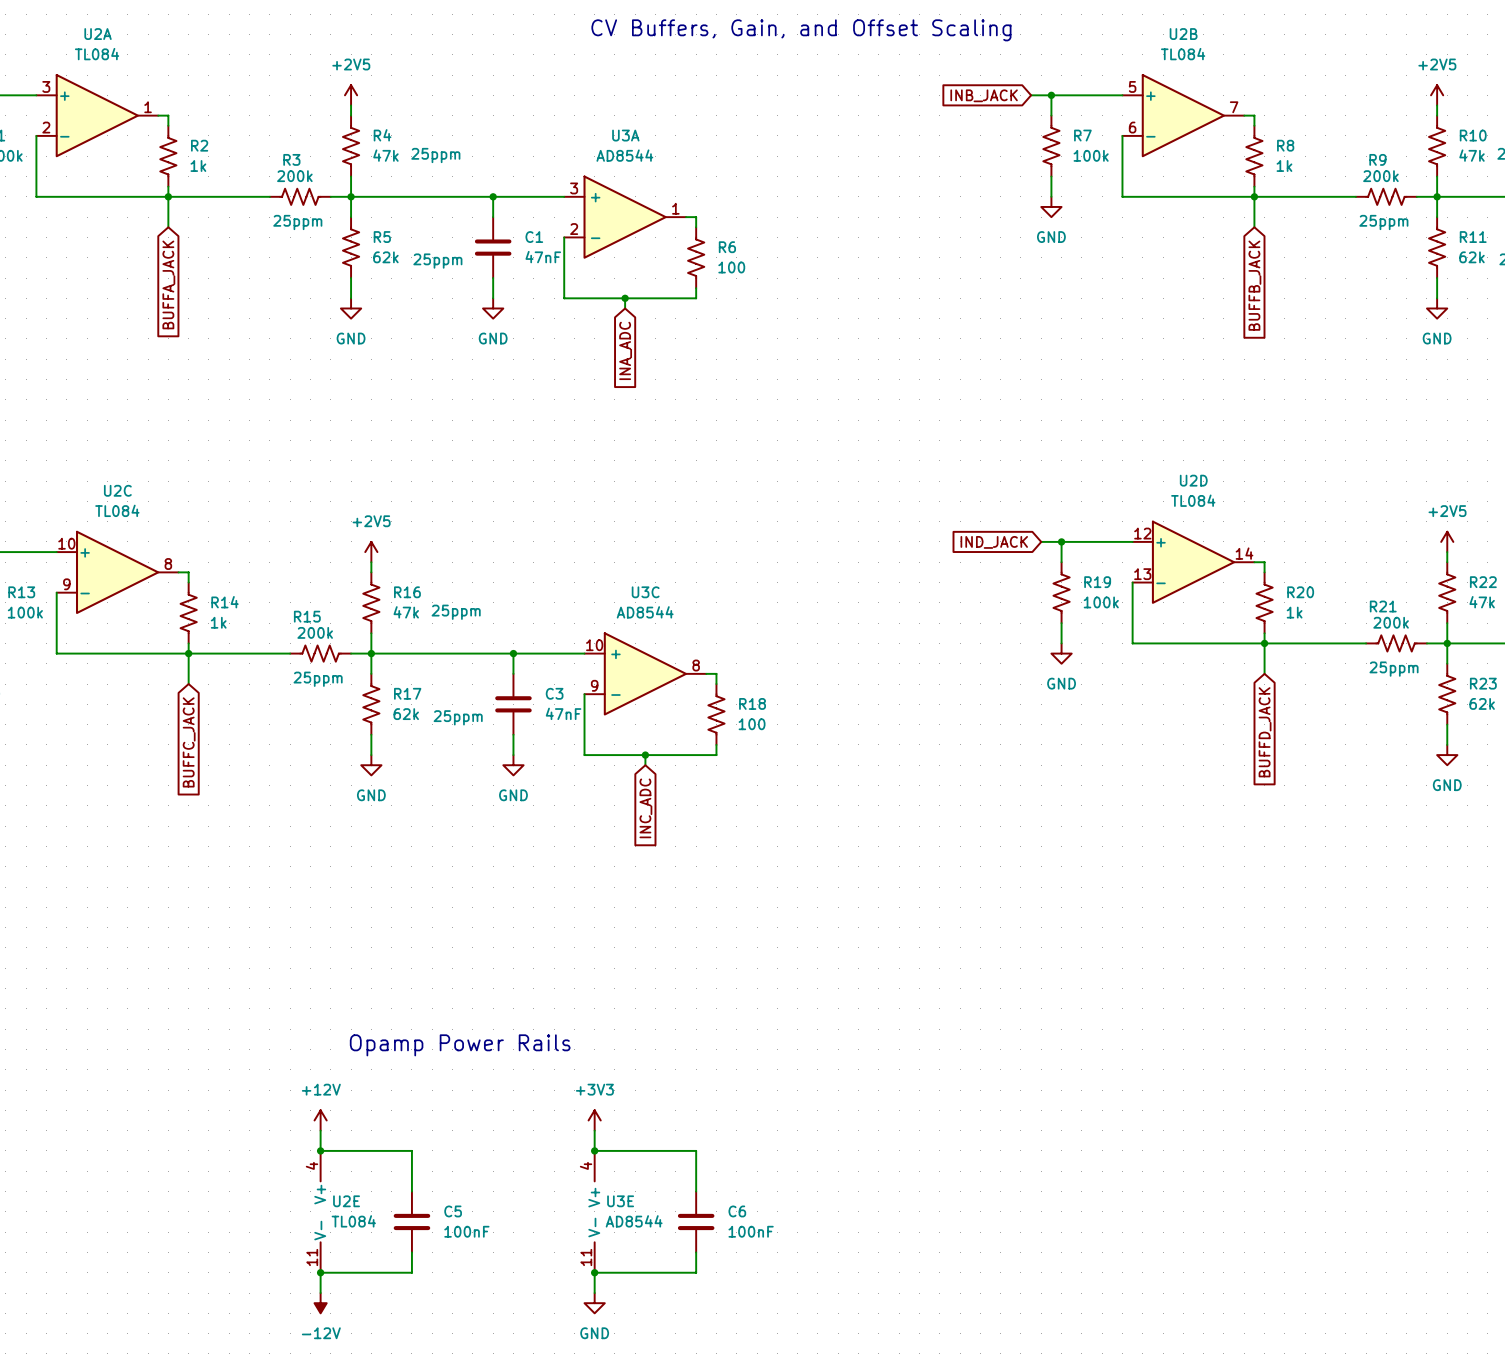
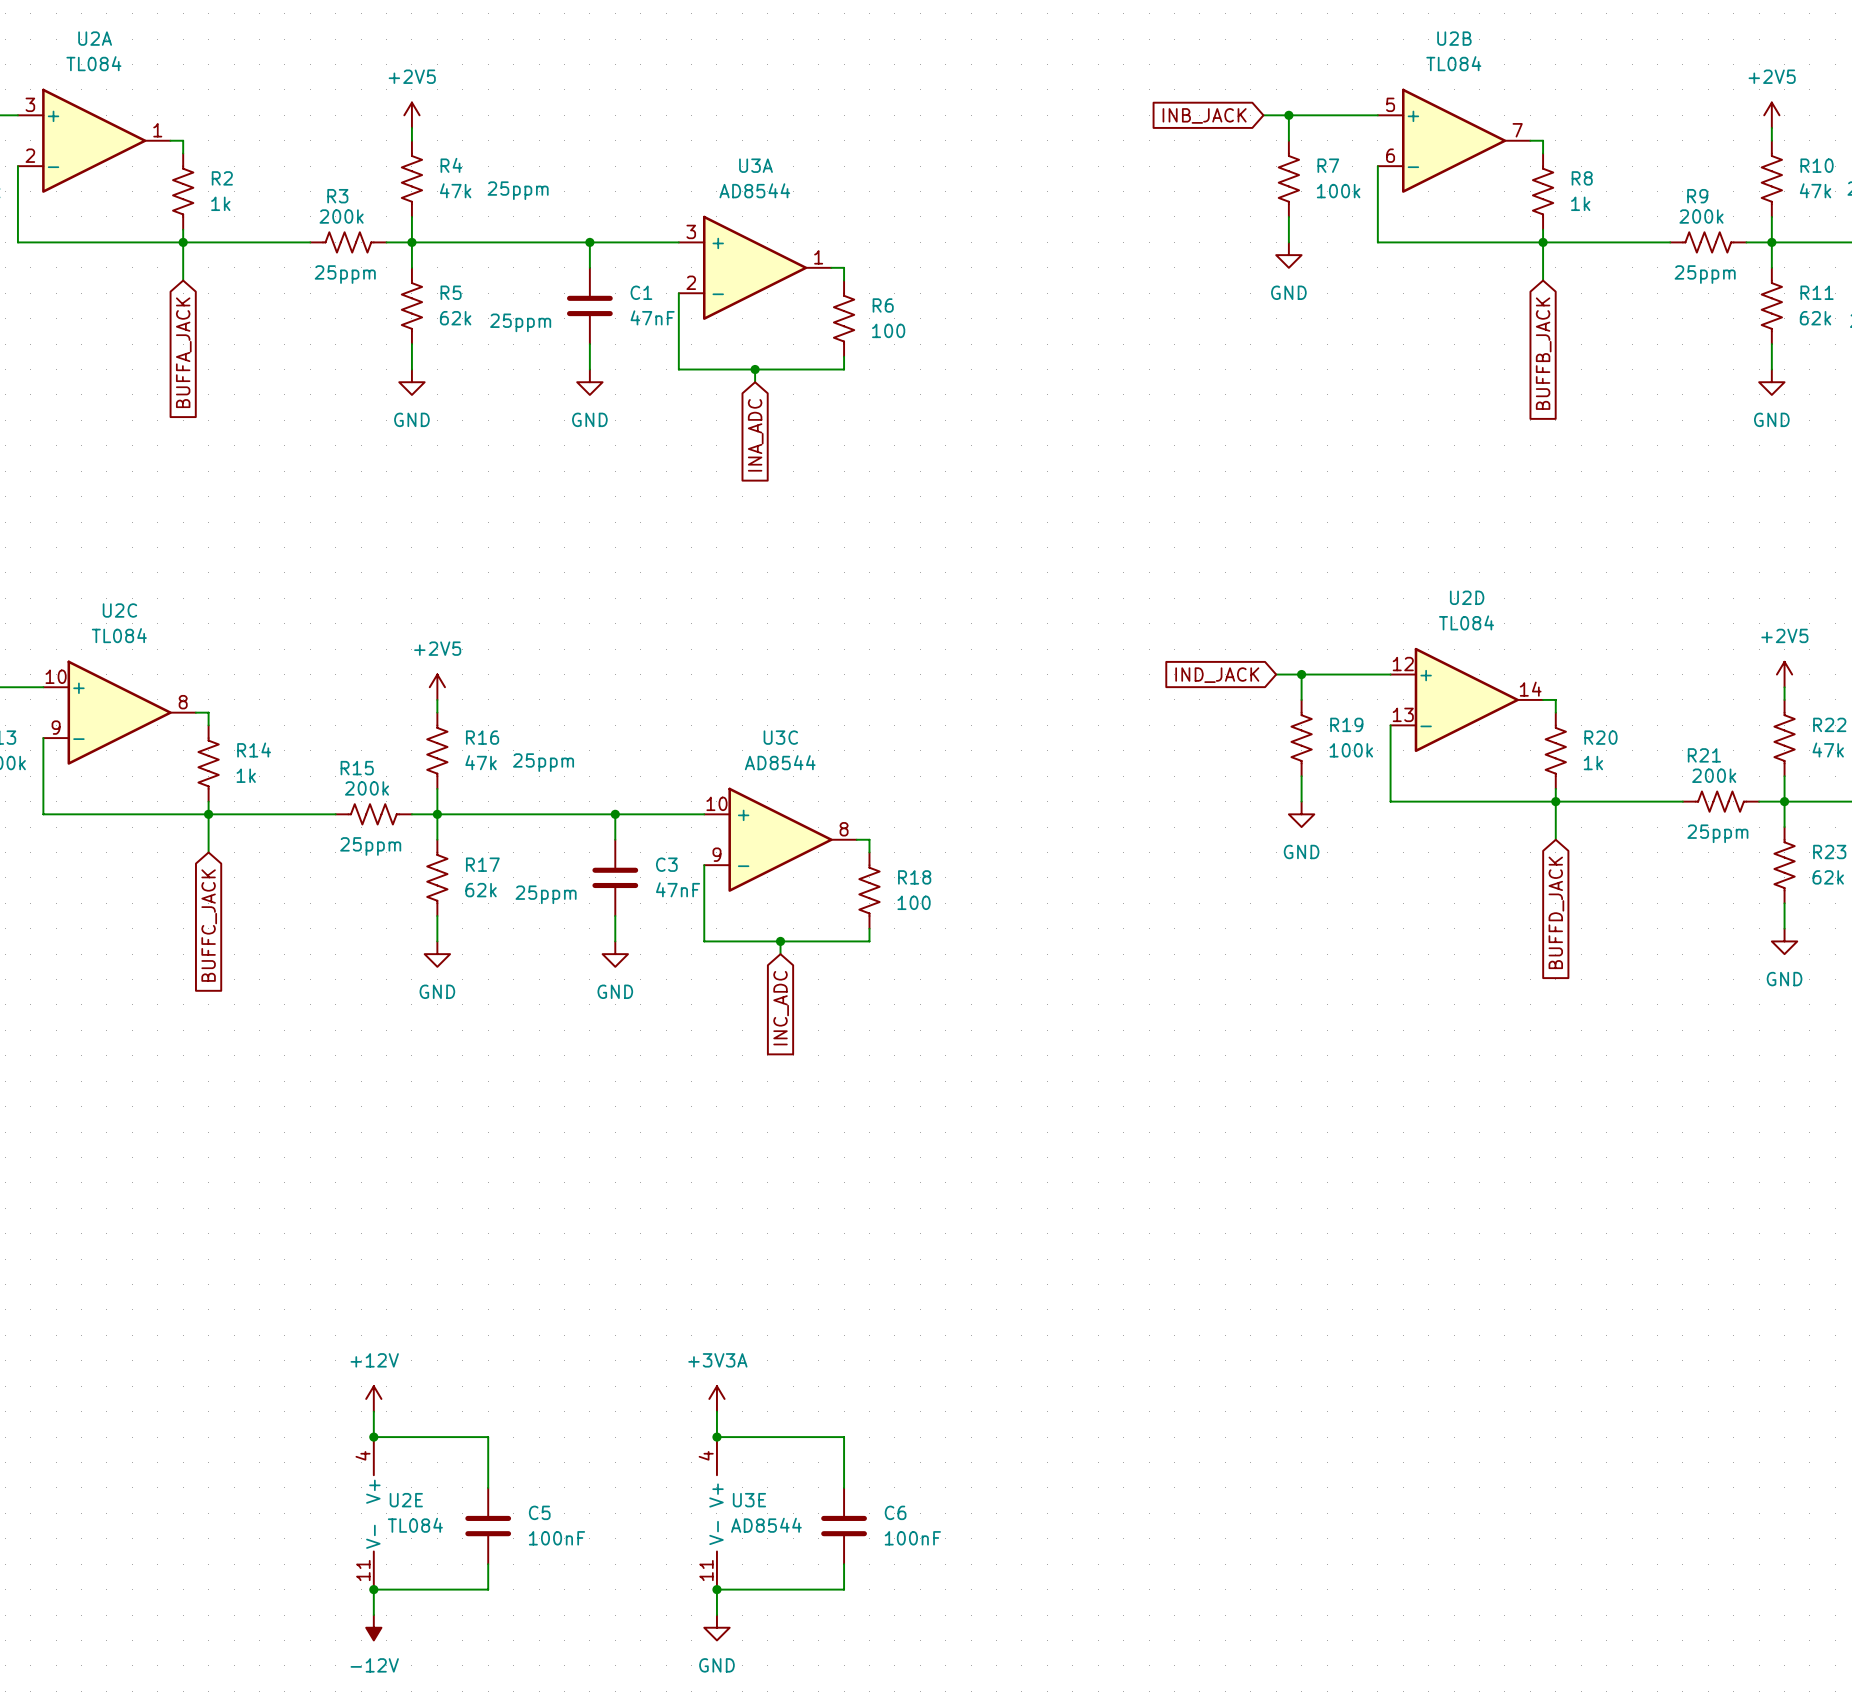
text: CV Buffers, Gain, and Offset Scaling (801, 30) -> none
text: Opamp Power Rails (460, 1045) -> none
power symbol: +3V3 (594, 1120) -> +3V3A (716, 1398)

